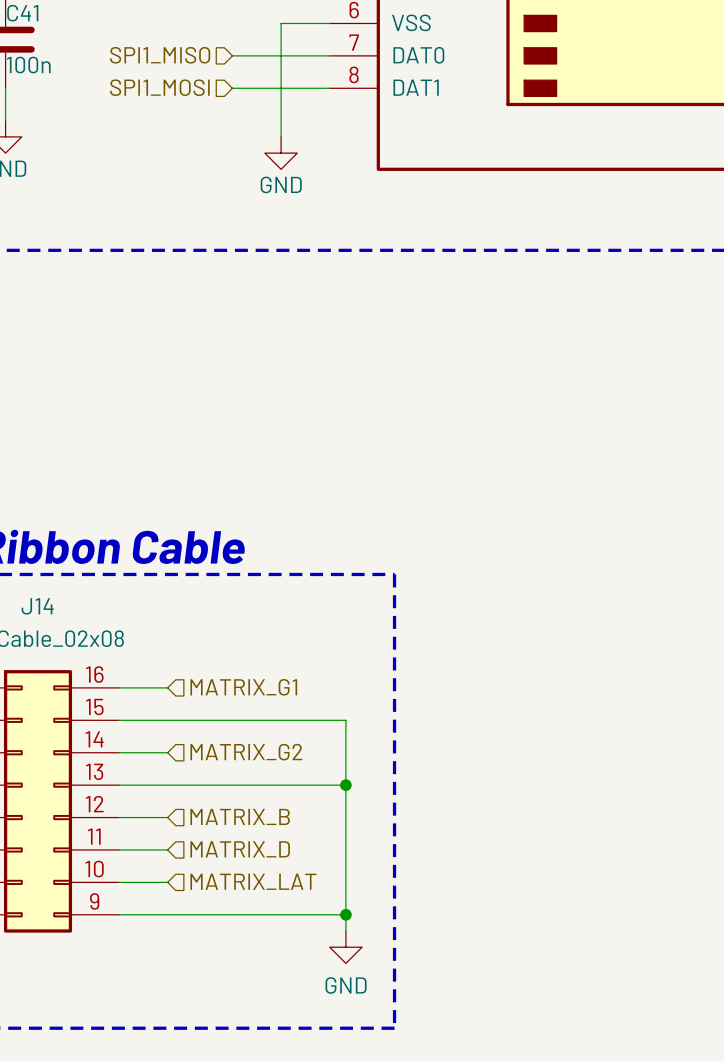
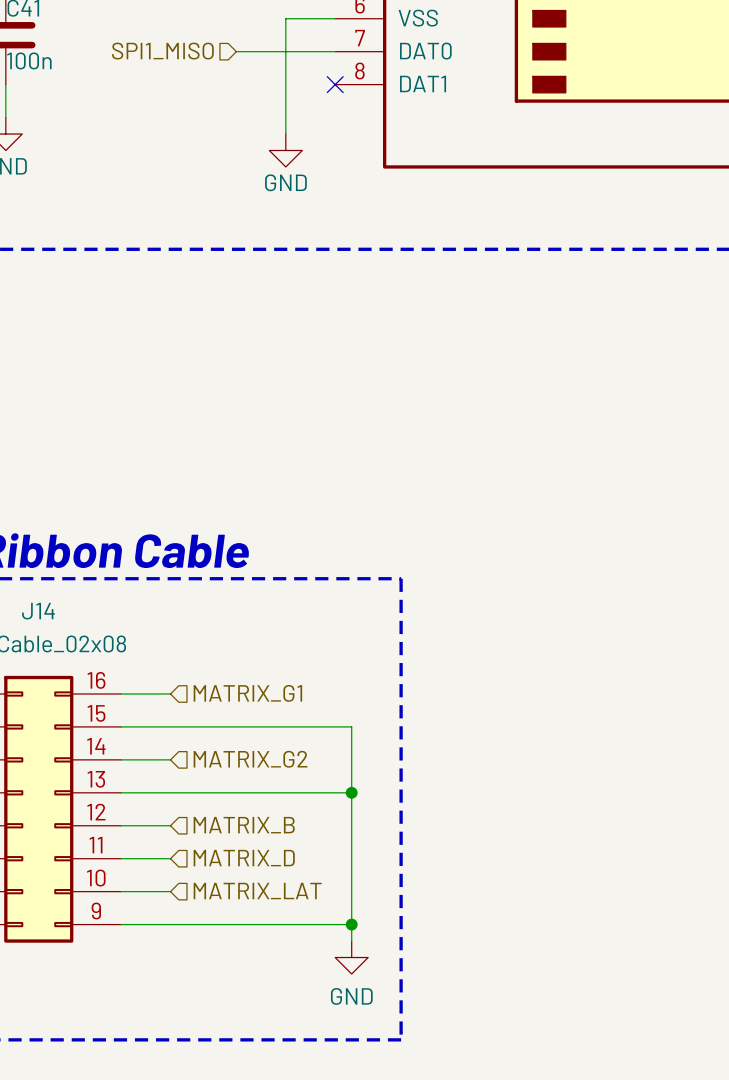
hierarchical label: SPI1_MOSI (159, 87) -> none
wire: (232, 88) (329, 88) -> none
no-connect mark: none -> (335, 84)

